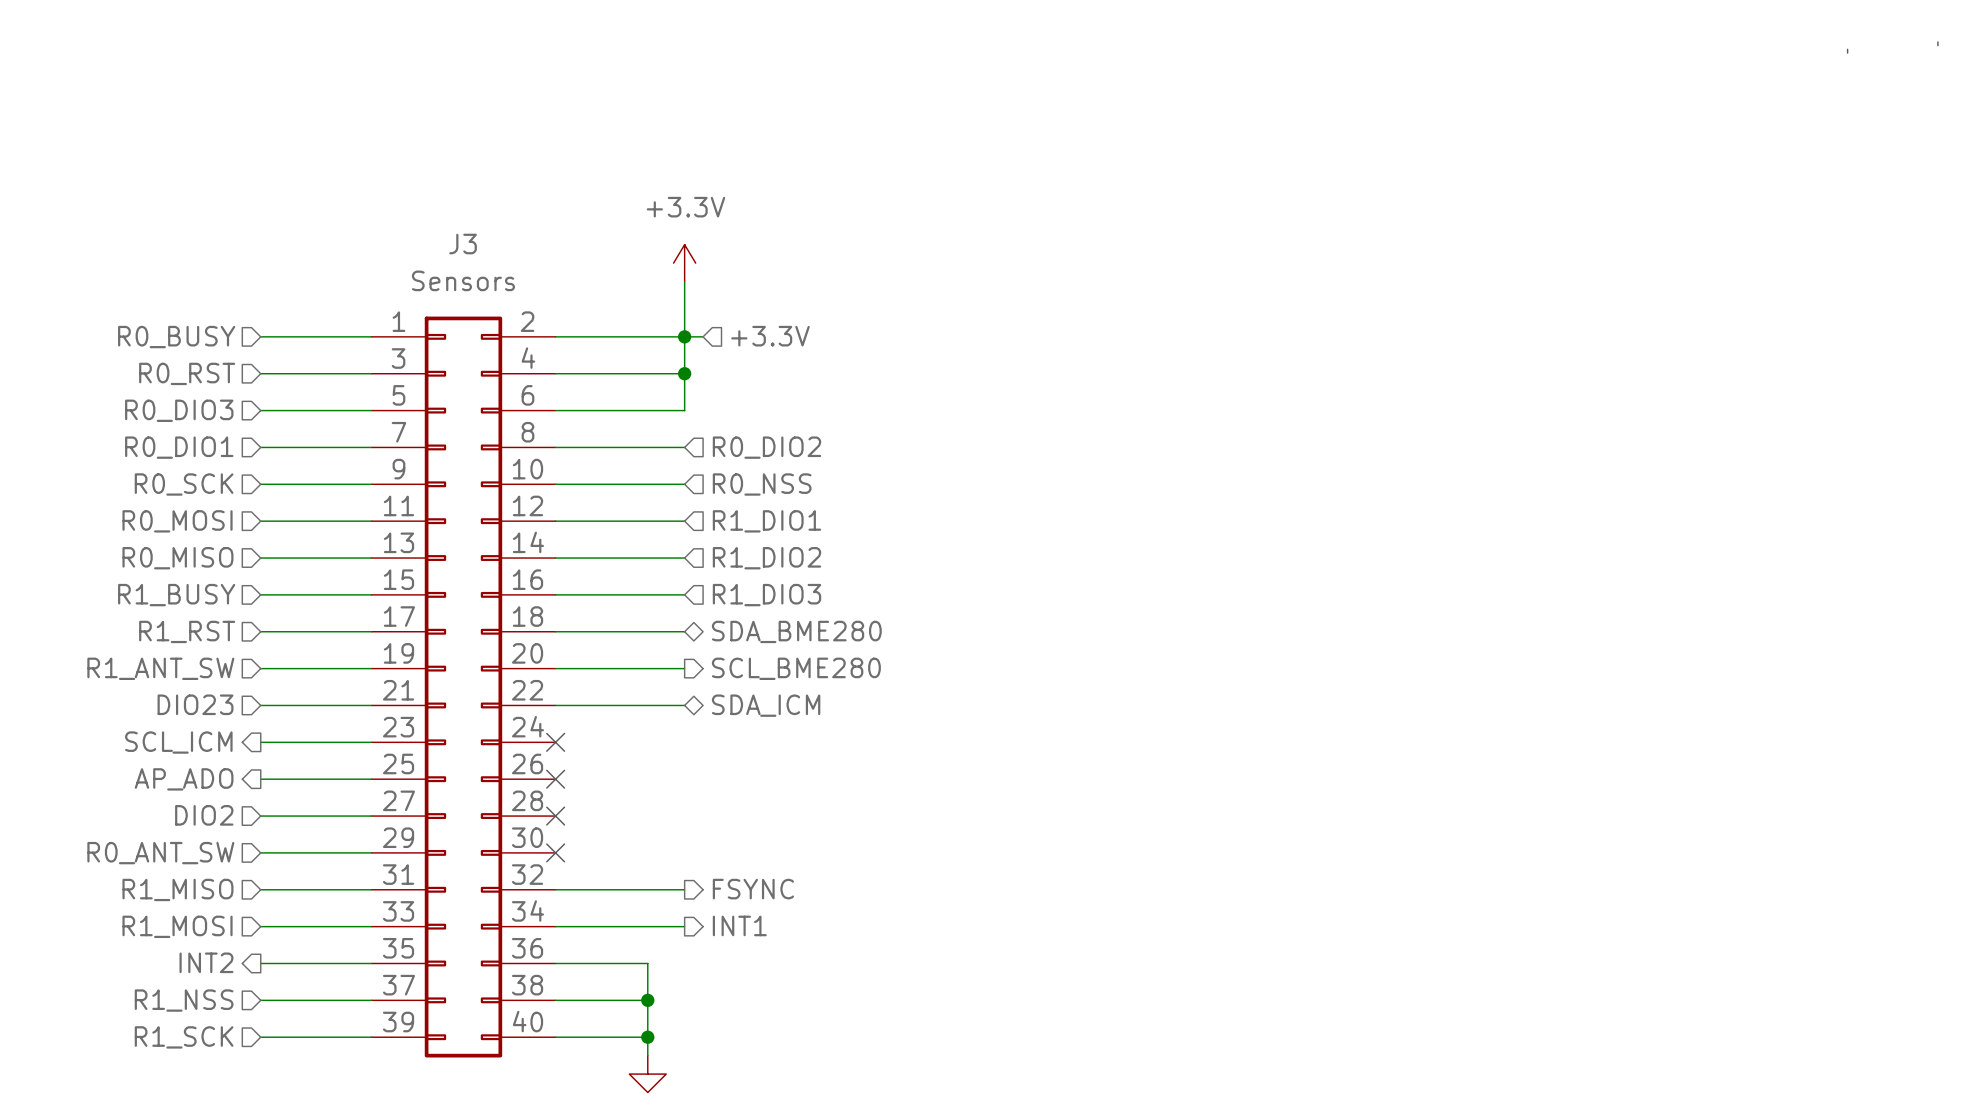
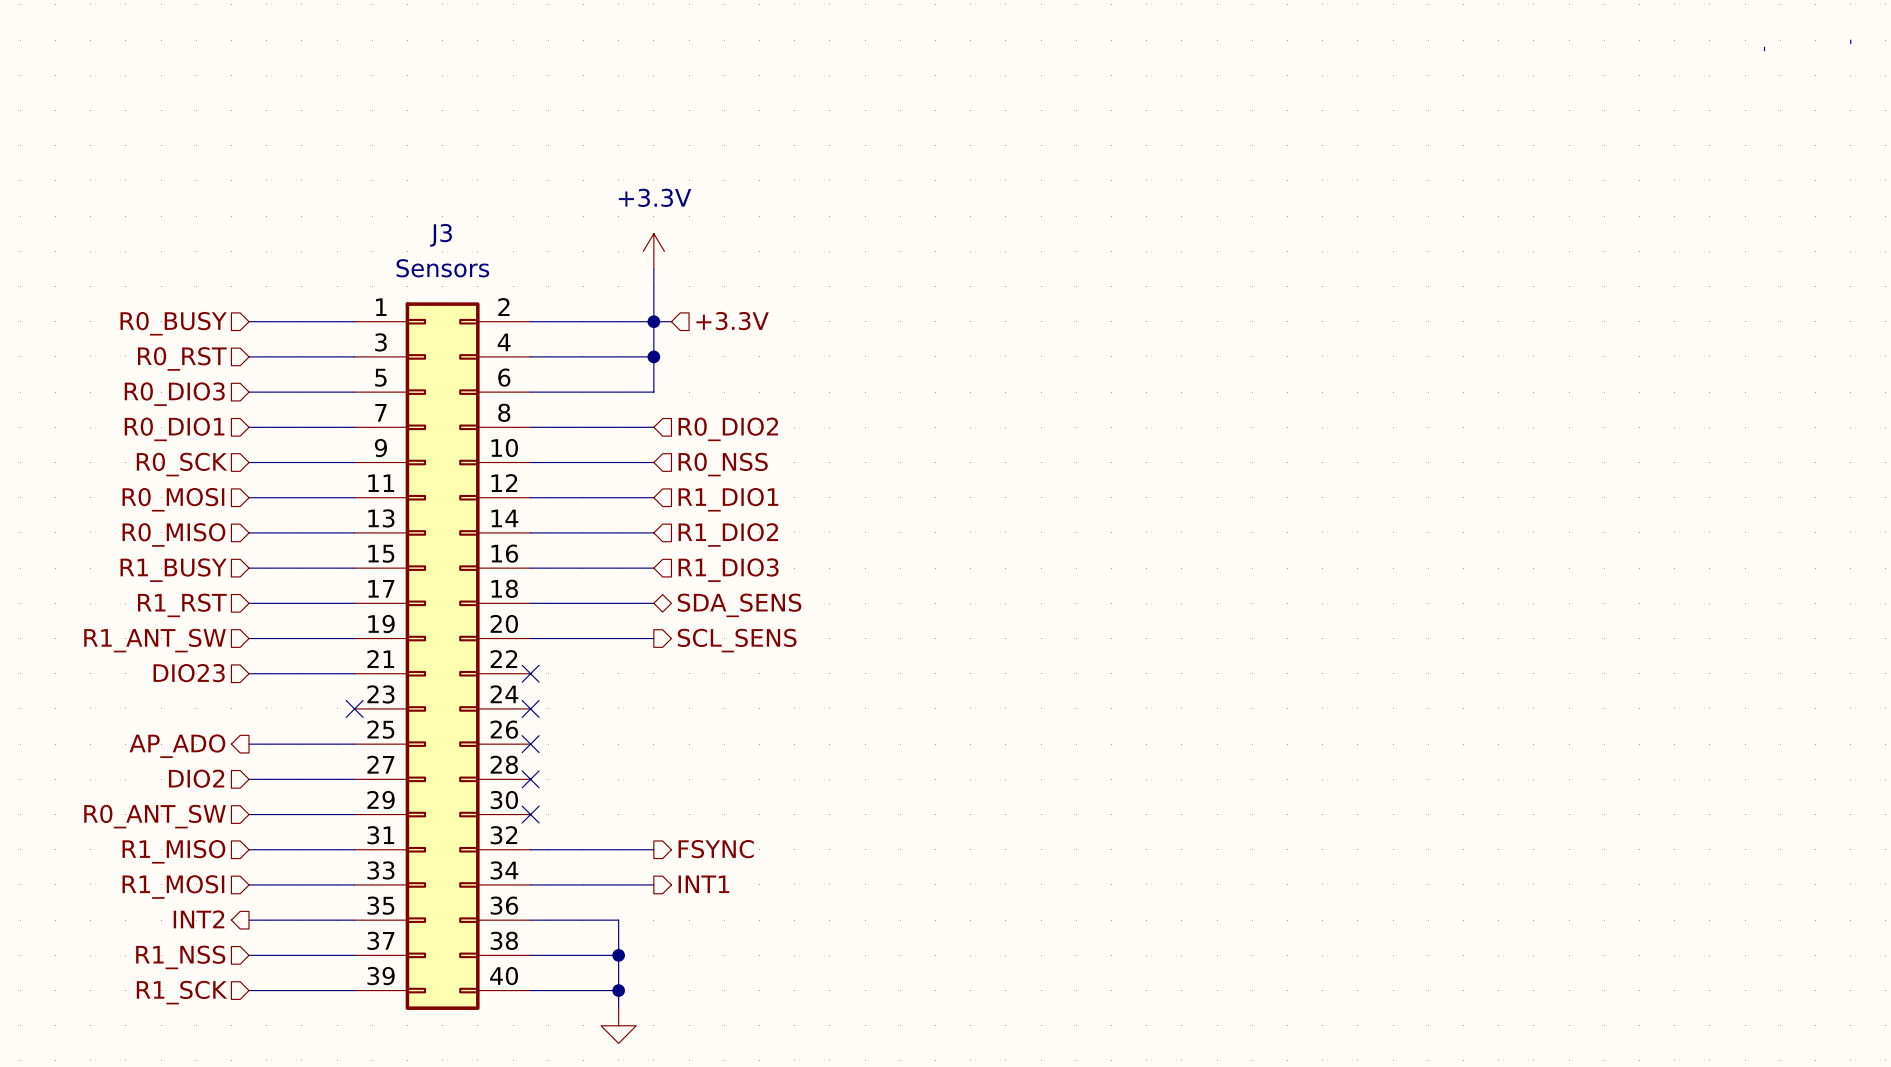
hierarchical label: SDA_BME280 (796, 631) -> SDA_SENS (739, 605)
hierarchical label: SCL_BME280 (796, 668) -> SCL_SENS (737, 640)
wire: (555, 705) (684, 705) -> none
no-connect mark: none -> (530, 673)
hierarchical label: SDA_ICM (766, 705) -> none
hierarchical label: SCL_ICM (178, 742) -> none
wire: (260, 742) (371, 742) -> none
no-connect mark: none -> (354, 708)

